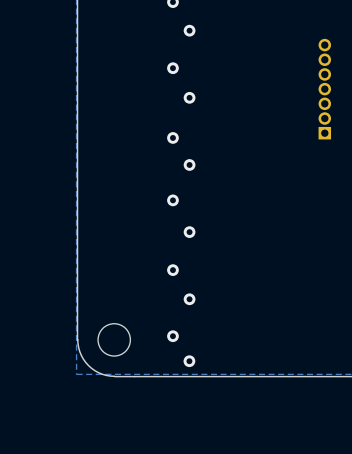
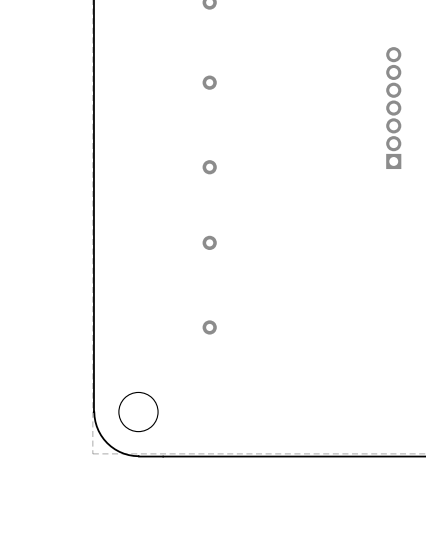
via: (189, 30) -> none
via: (189, 97) -> none
via: (189, 164) -> none
via: (189, 232) -> none
via: (189, 299) -> none
via: (172, 336) -> none
via: (189, 361) -> none

